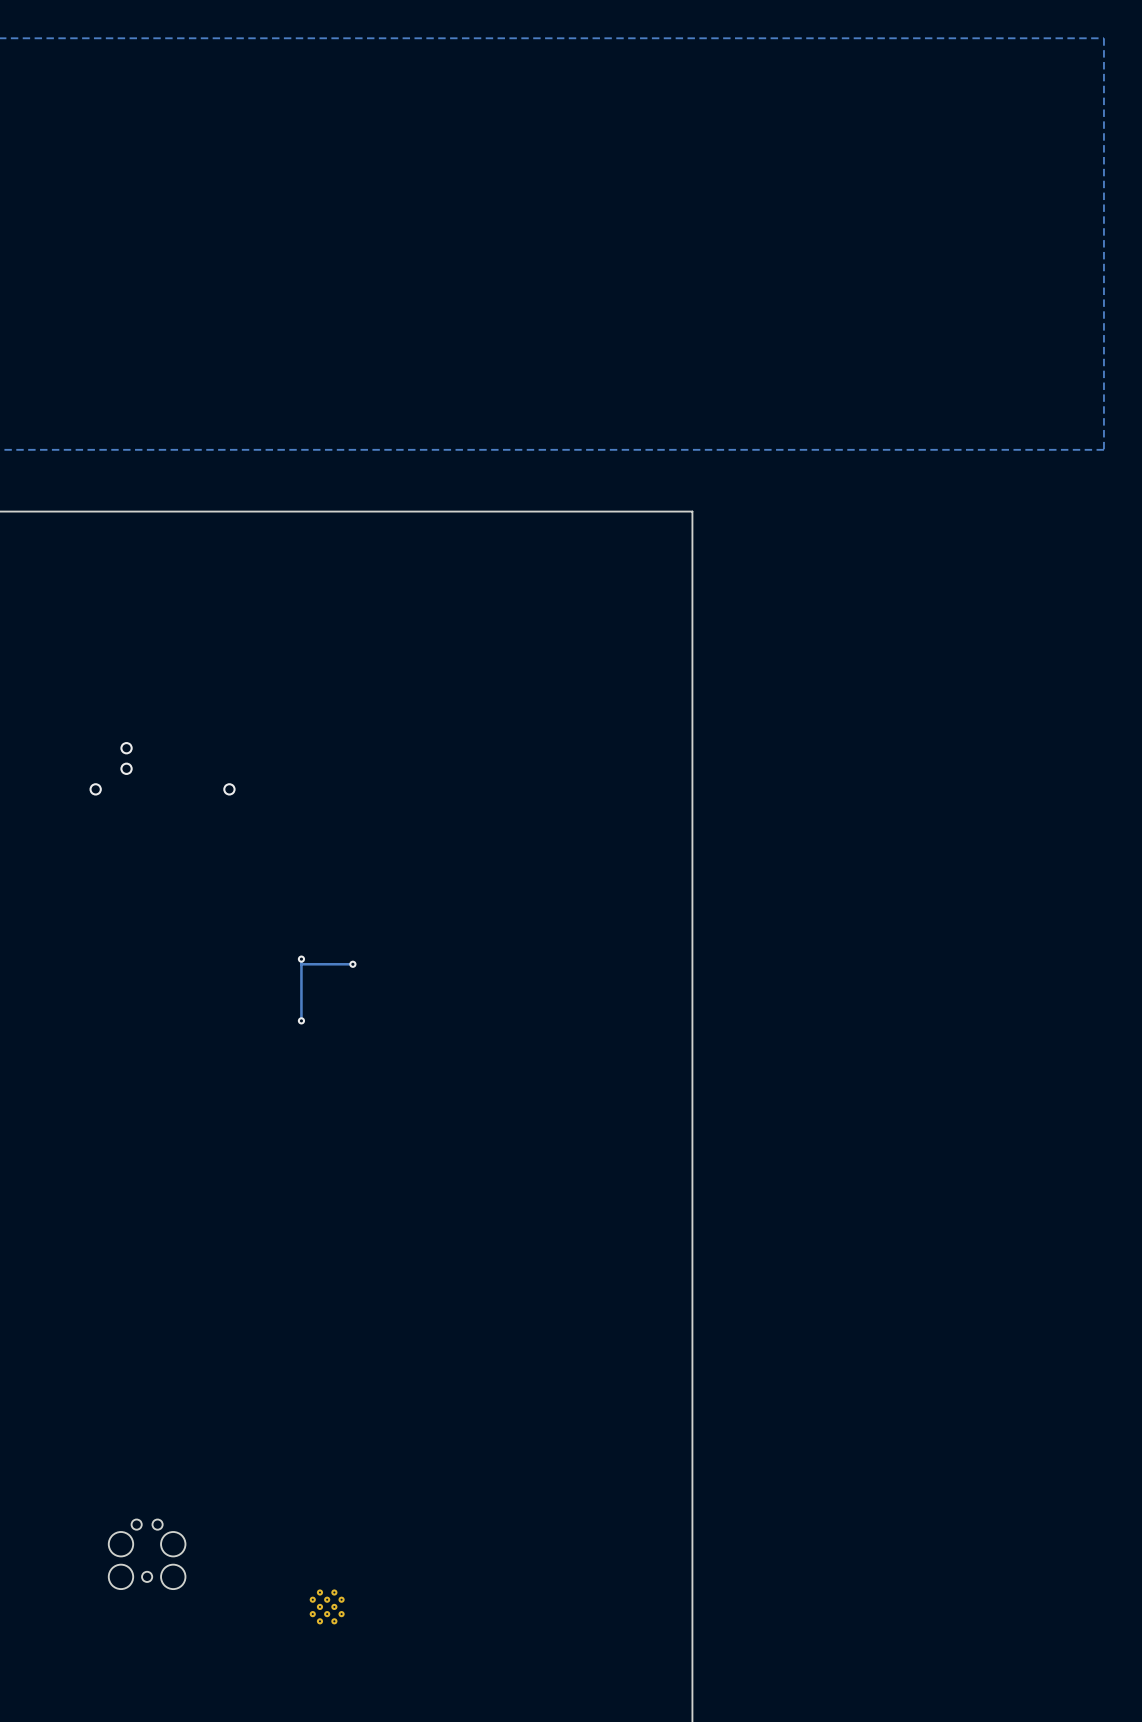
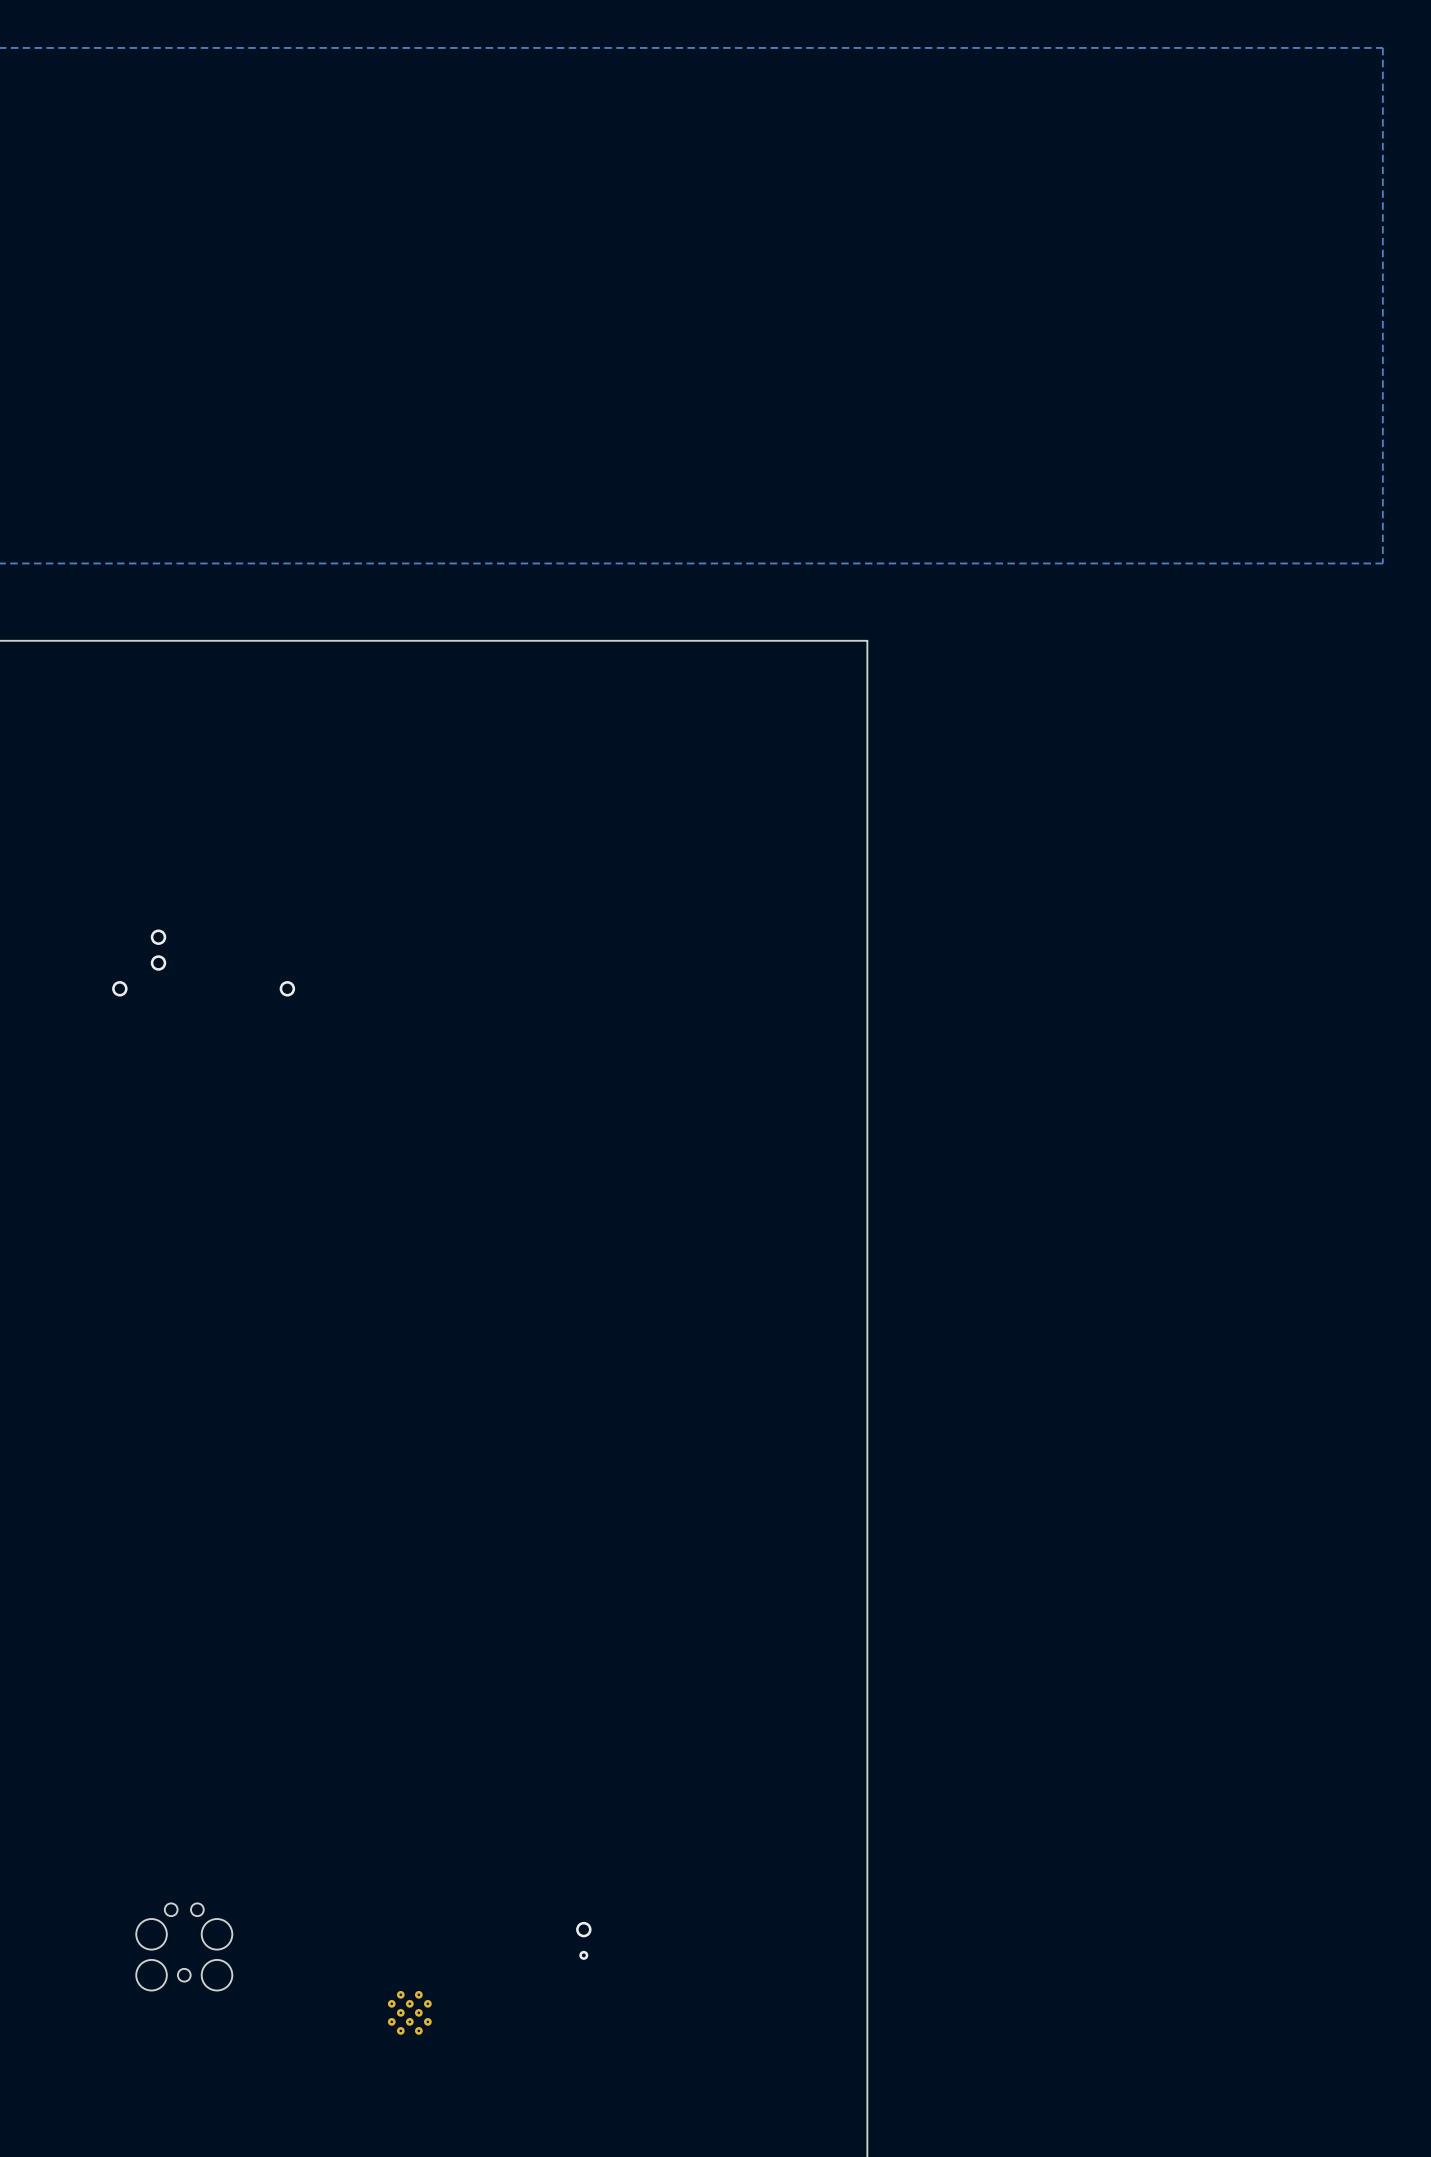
track: (301, 959) (301, 1020) -> none
via: (301, 959) -> none
track: (352, 964) (301, 964) -> none
via: (352, 964) -> none
via: (301, 1020) -> none
via: none -> (583, 1929)
via: none -> (583, 1955)

